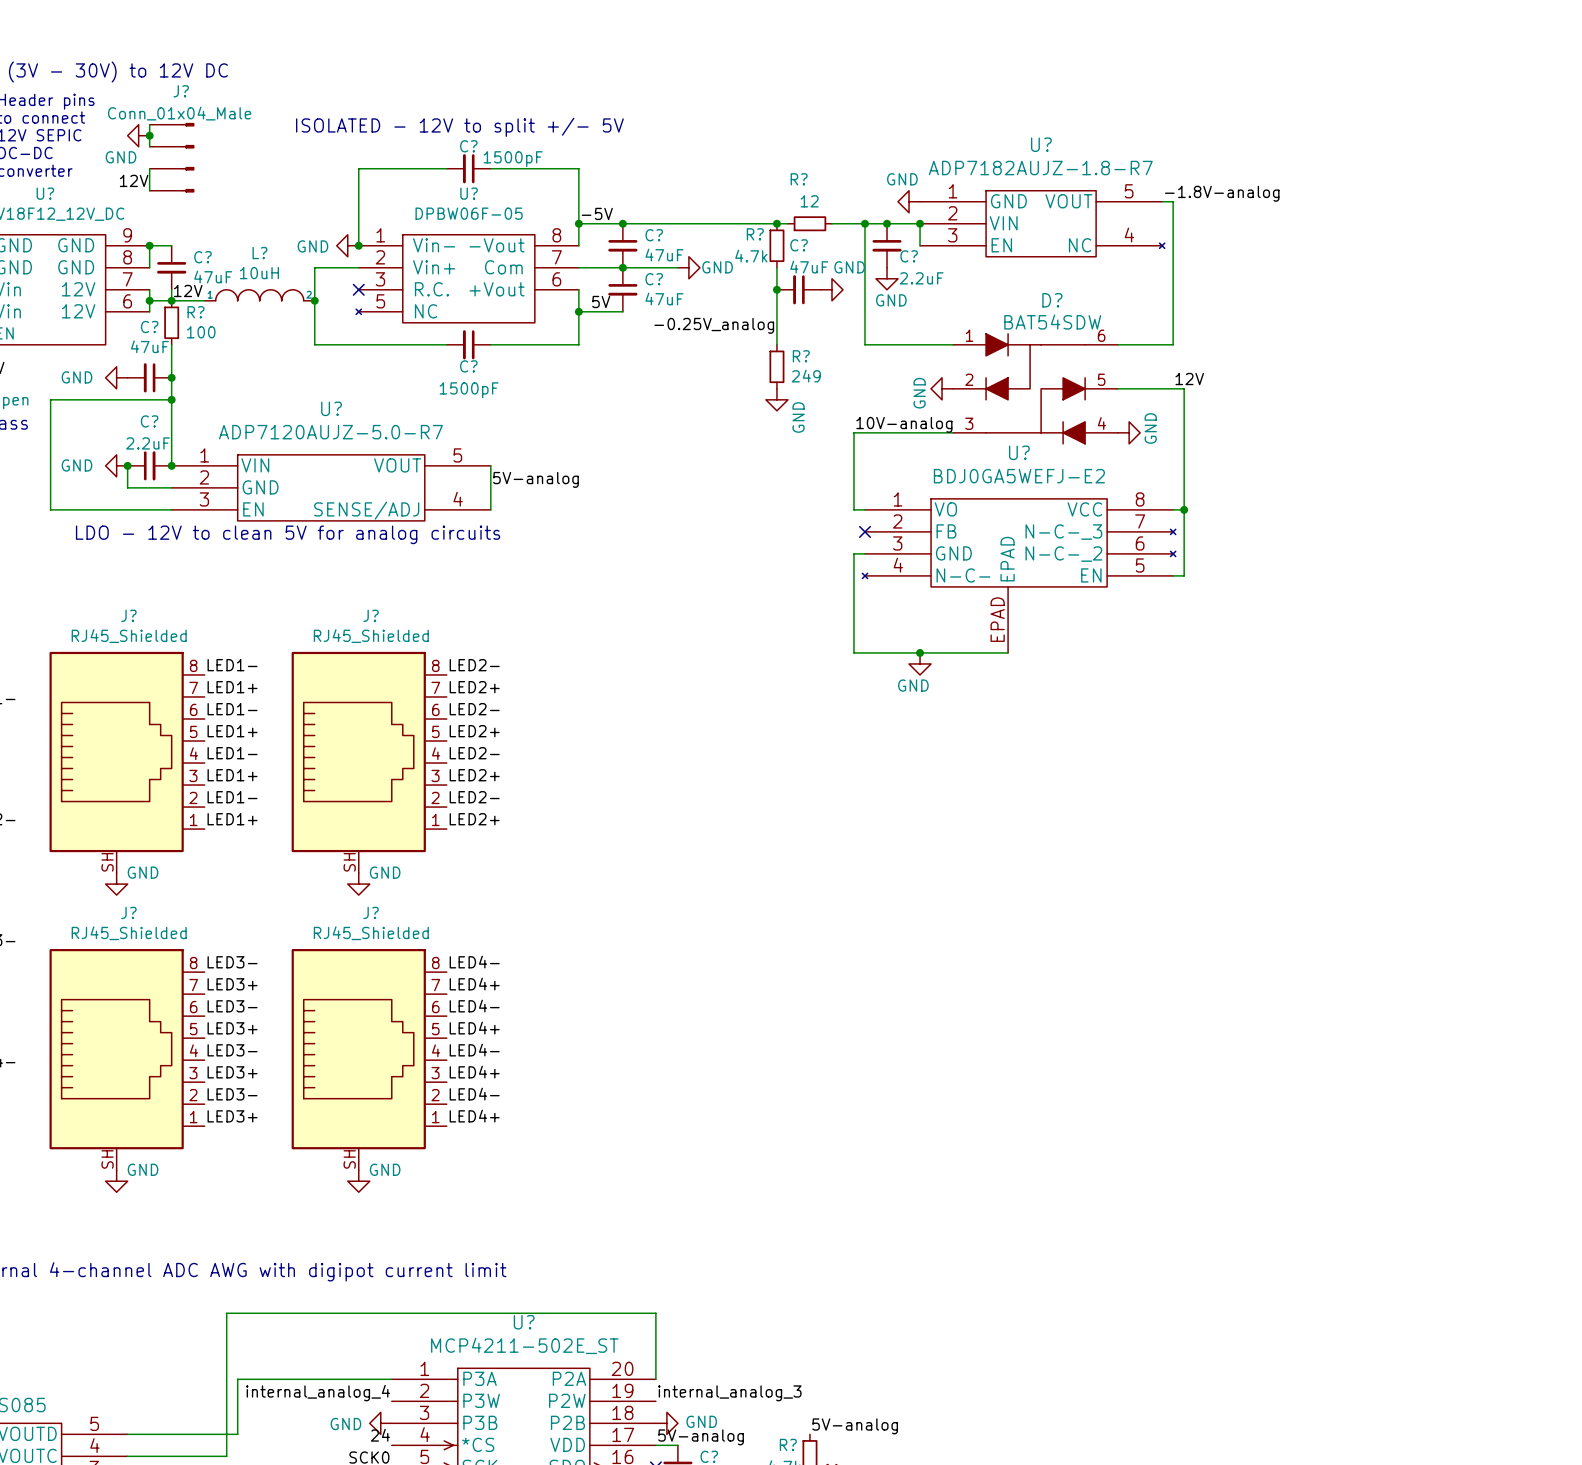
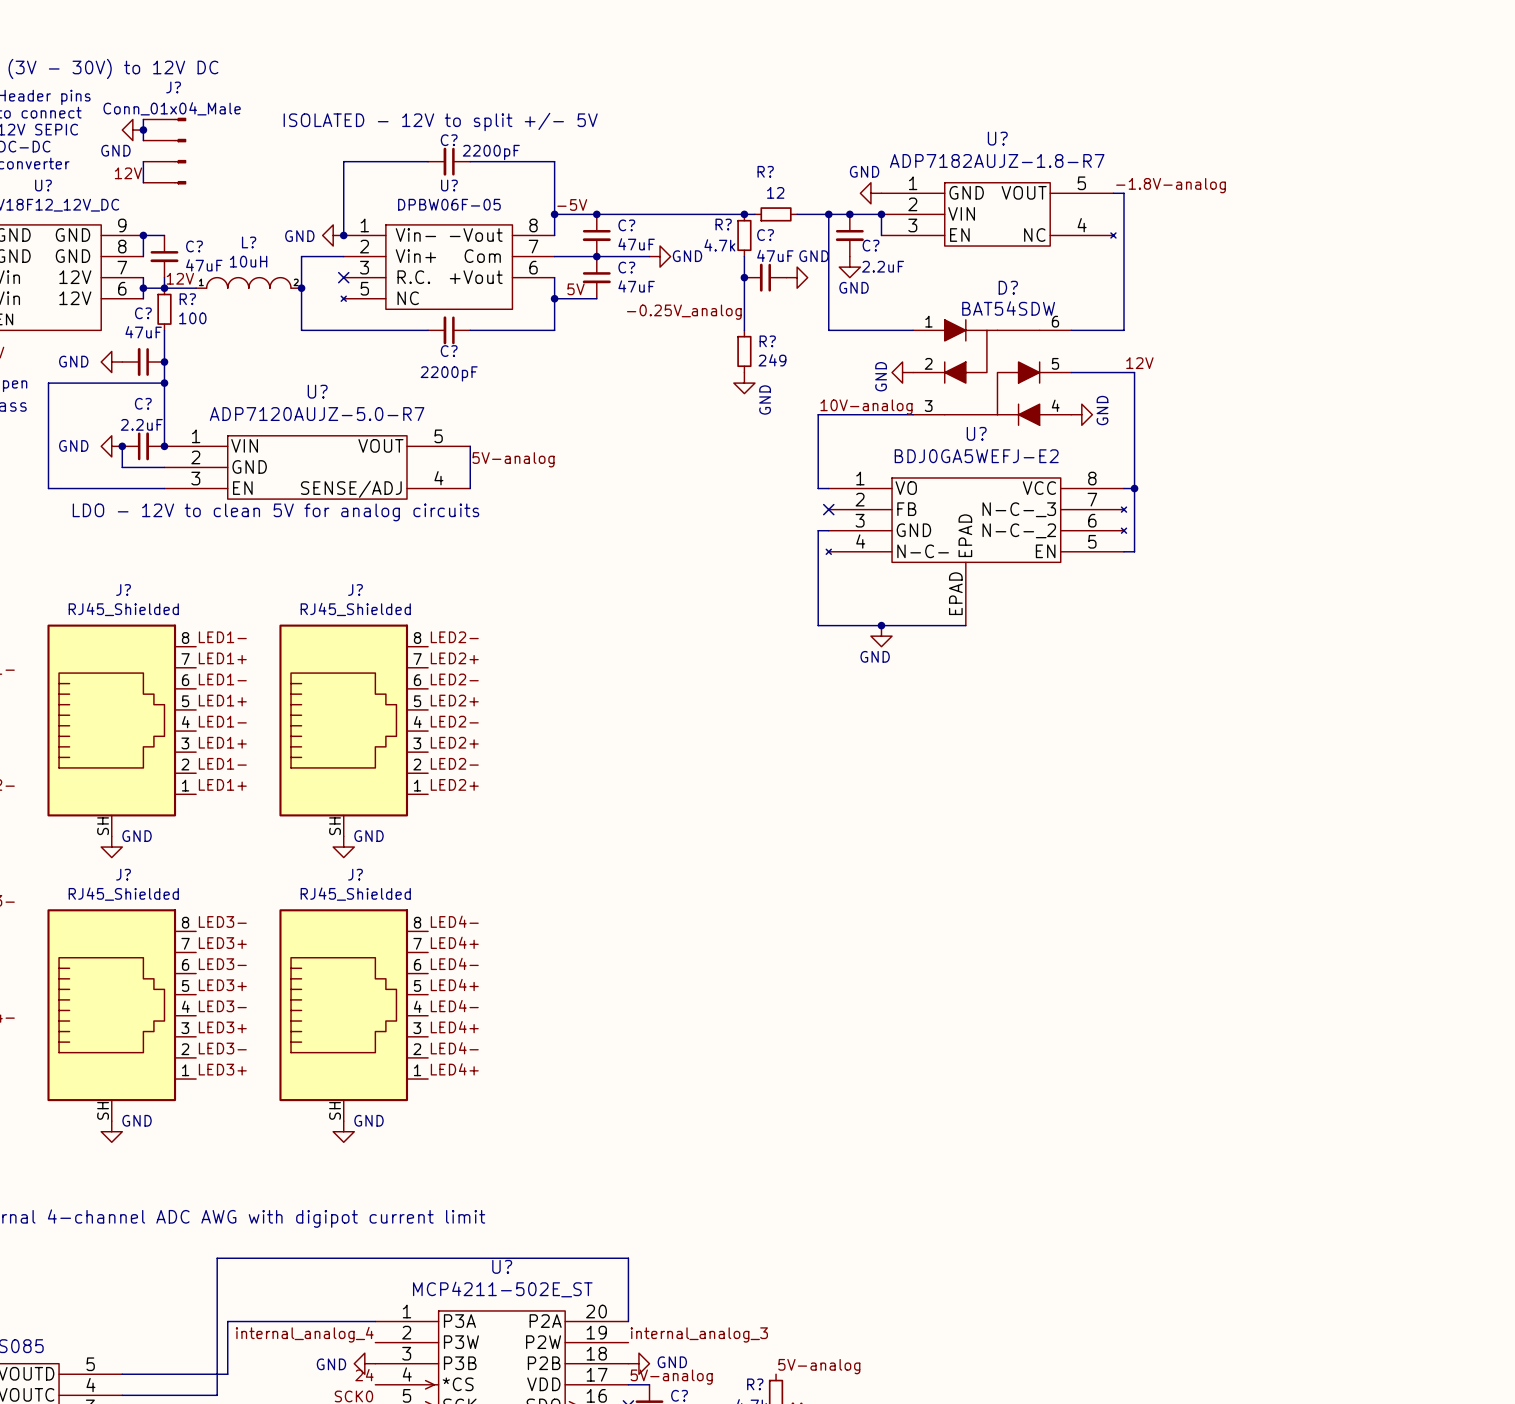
C? value: 1500pF (513, 159) -> 2200pF (491, 152)
C? value: 1500pF (469, 390) -> 2200pF (449, 373)

